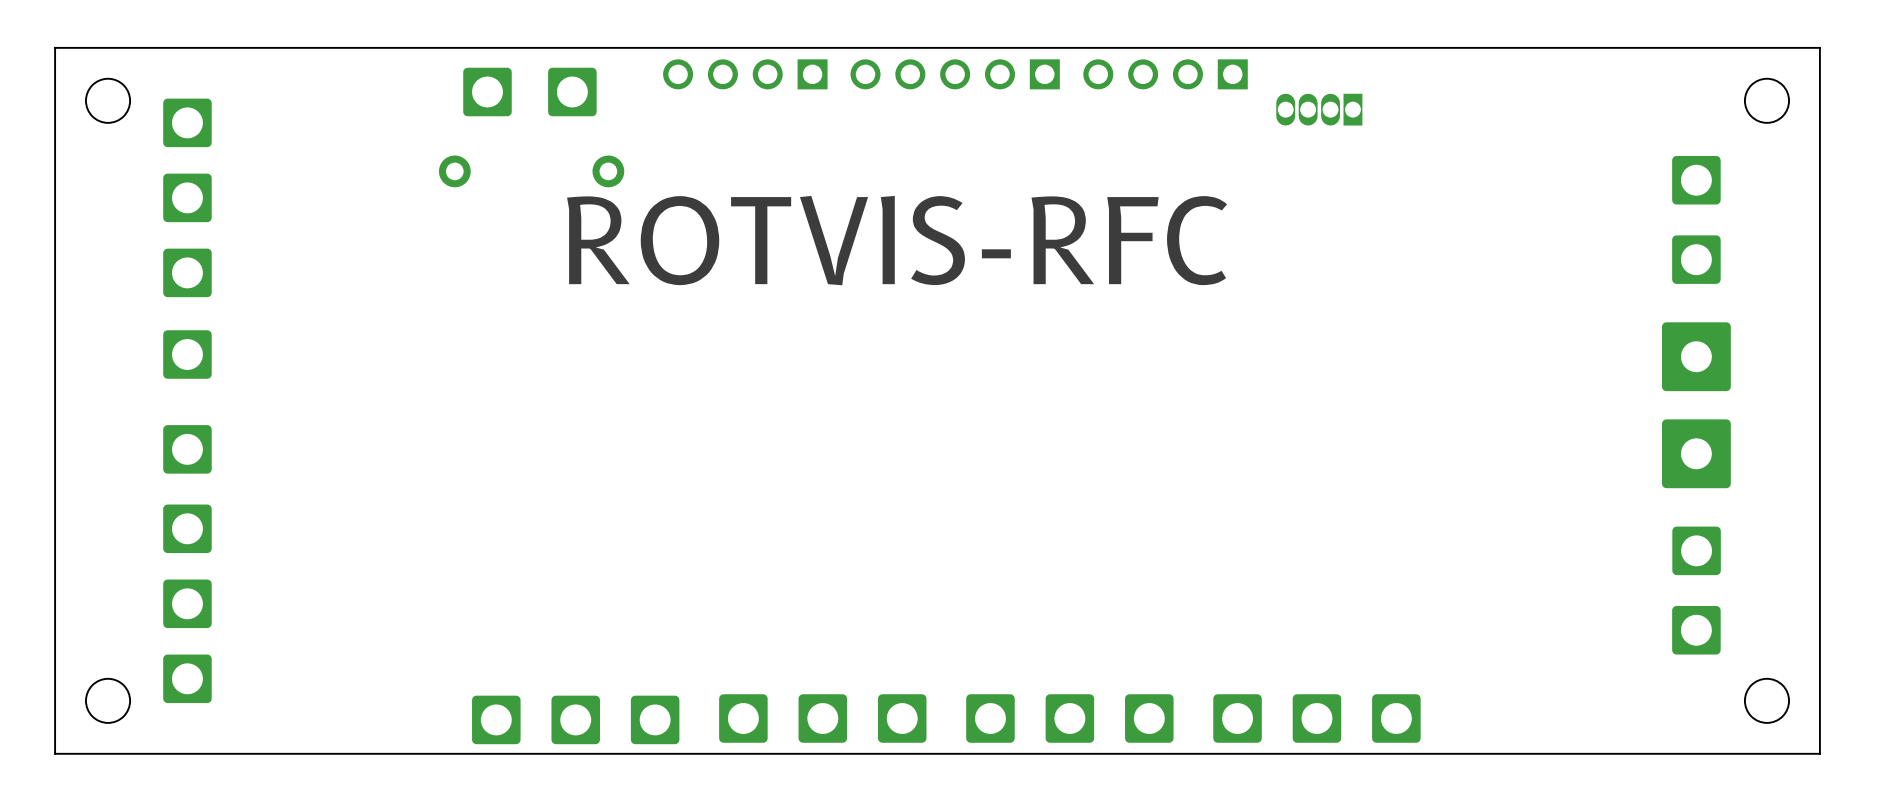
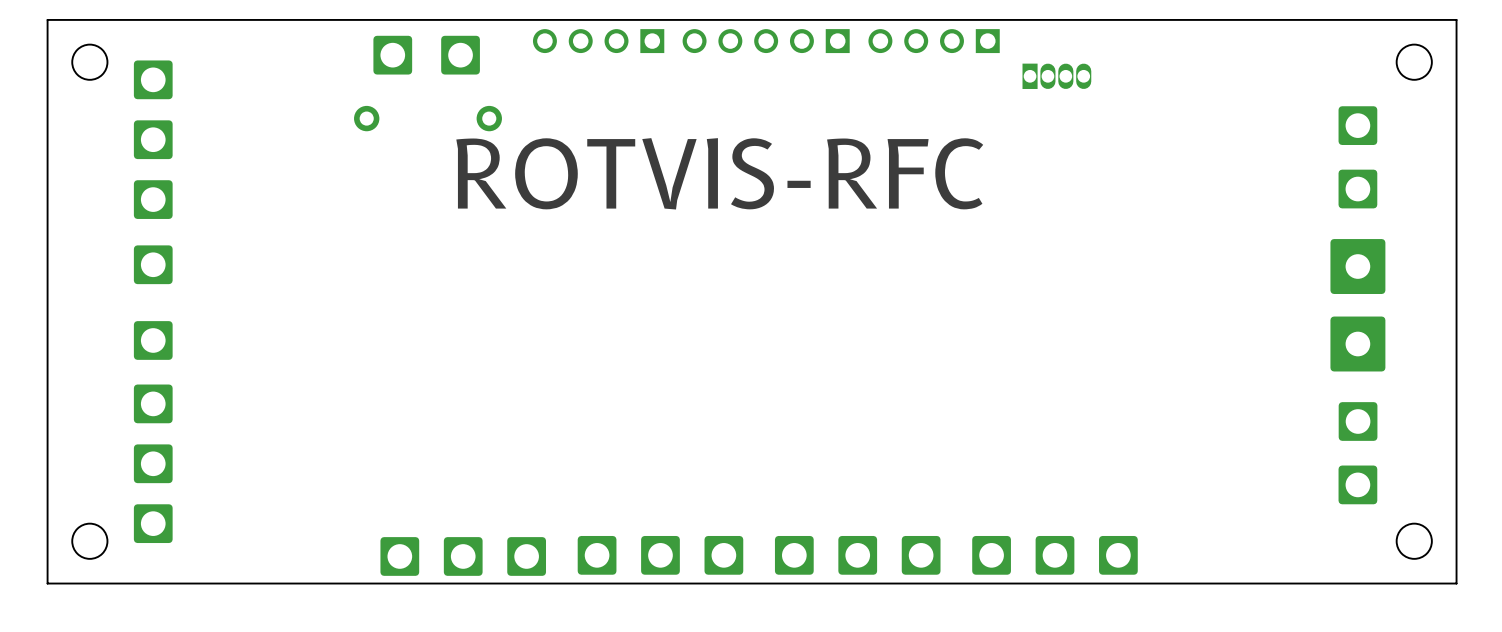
part rotation: 0° (1319, 109) -> 180° (1056, 76)

